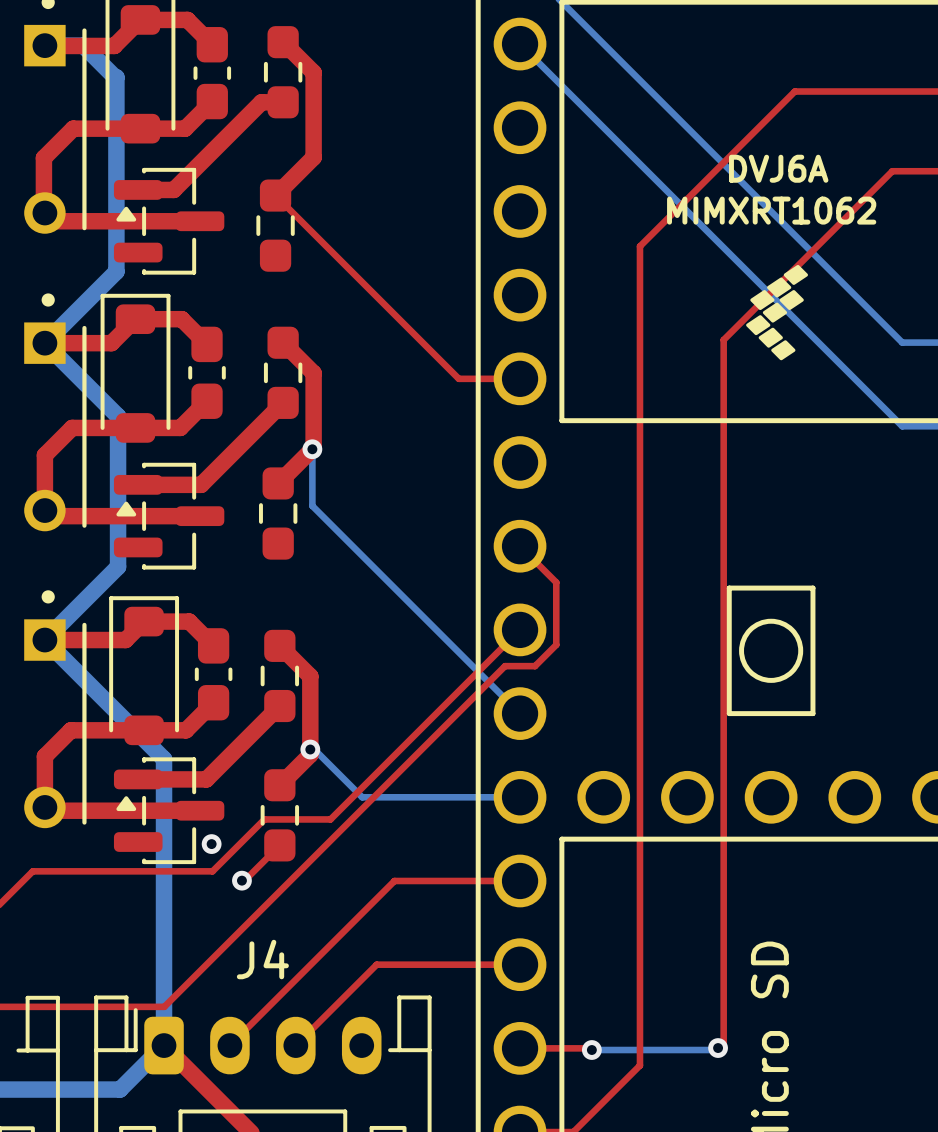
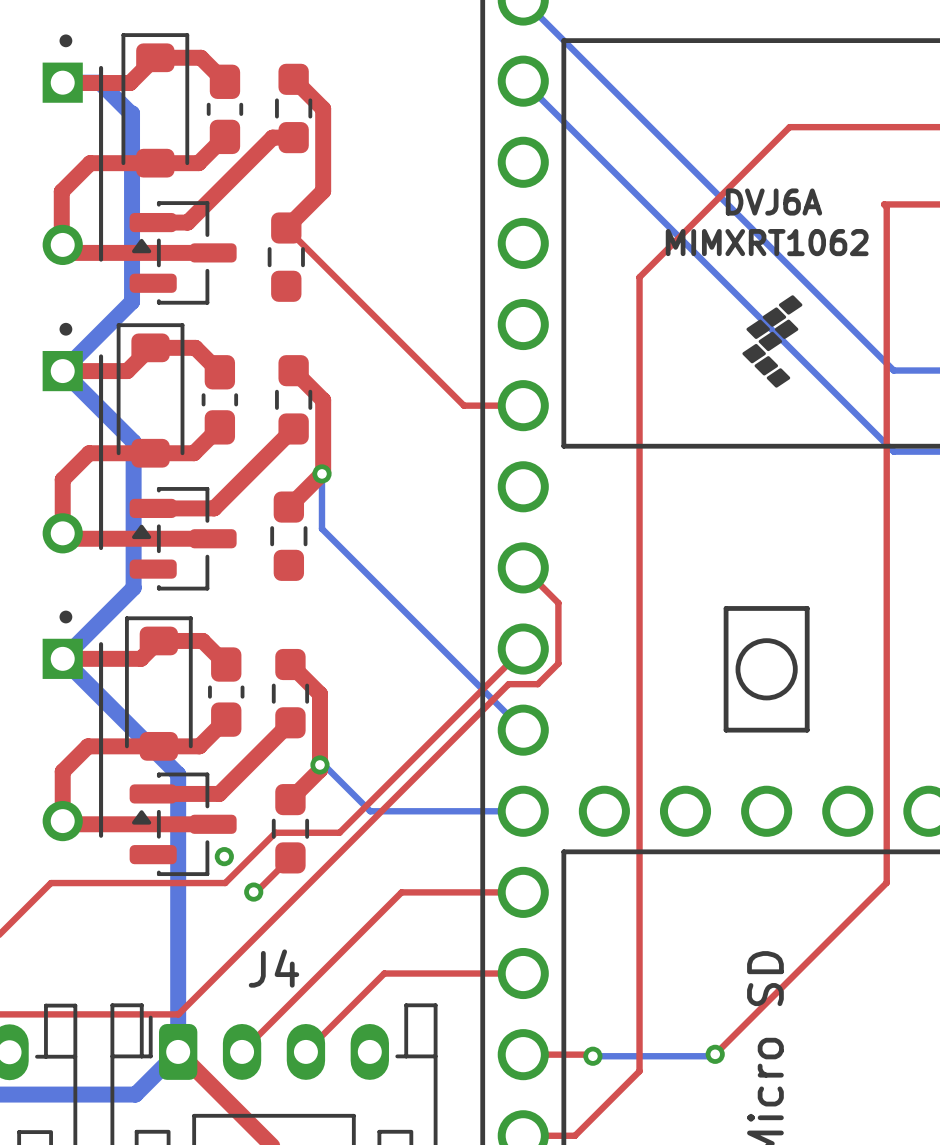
top track: (892, 171) (723, 339) (723, 1042) -> (884, 204) (886, 207) (886, 882) (720, 1048)

